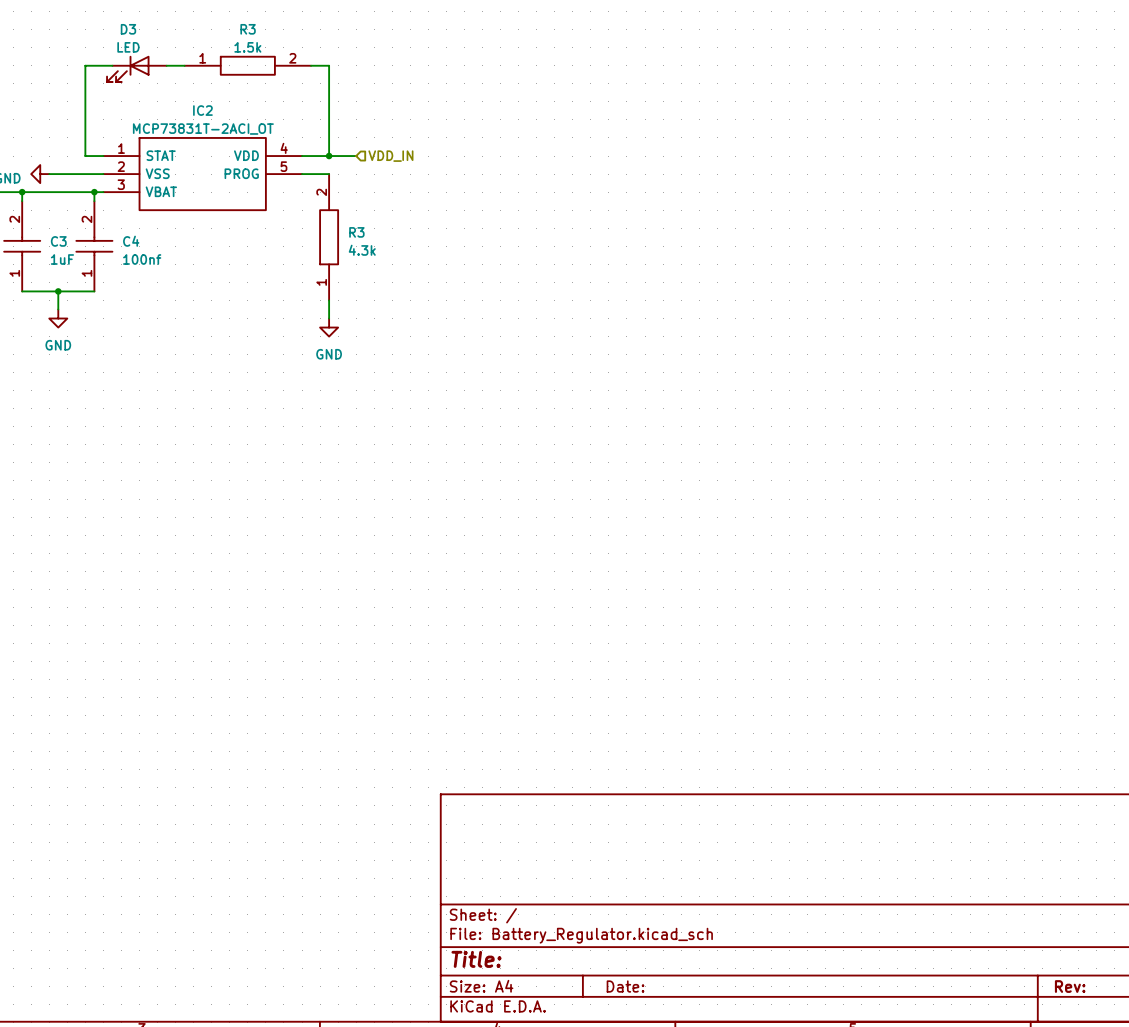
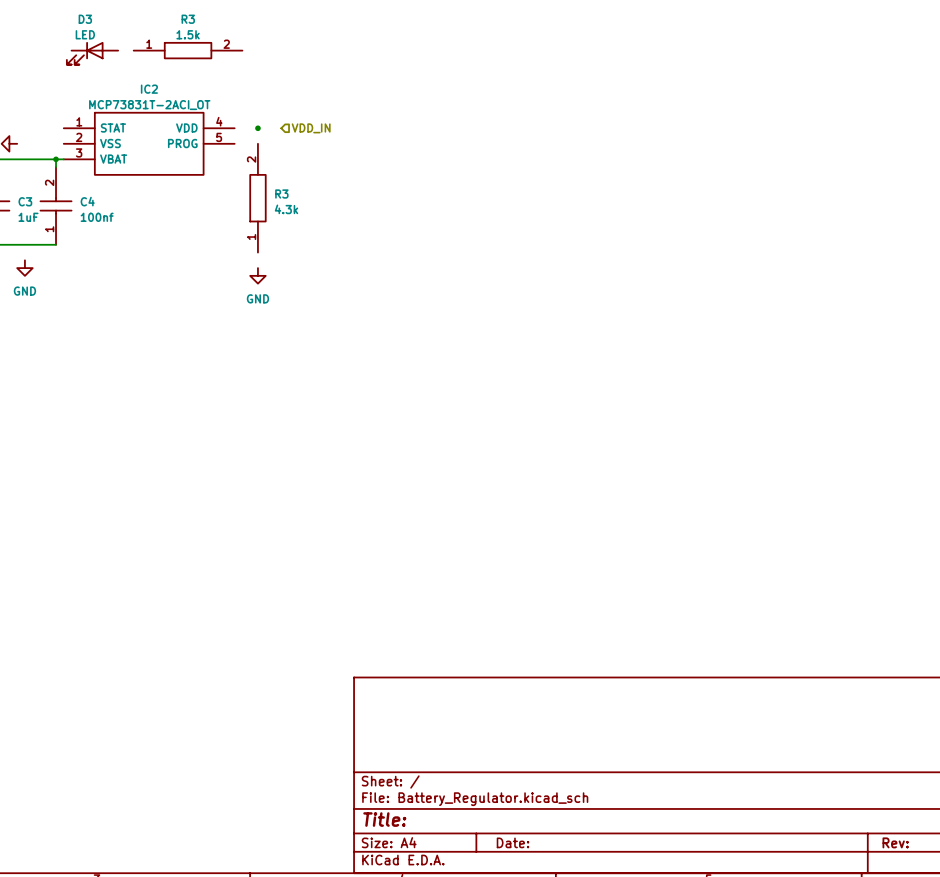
wire: (112, 65) (85, 65) (85, 156) (103, 156) -> none
wire: (166, 65) (184, 65) -> none
wire: (311, 65) (329, 65) (329, 156) -> none
wire: (302, 156) (356, 156) -> none
wire: (49, 174) (103, 174) -> none
wire: (302, 174) (329, 174) -> none
wire: (58, 291) (58, 309) -> none
junction: (58, 291) -> none
wire: (329, 300) (329, 318) -> none

